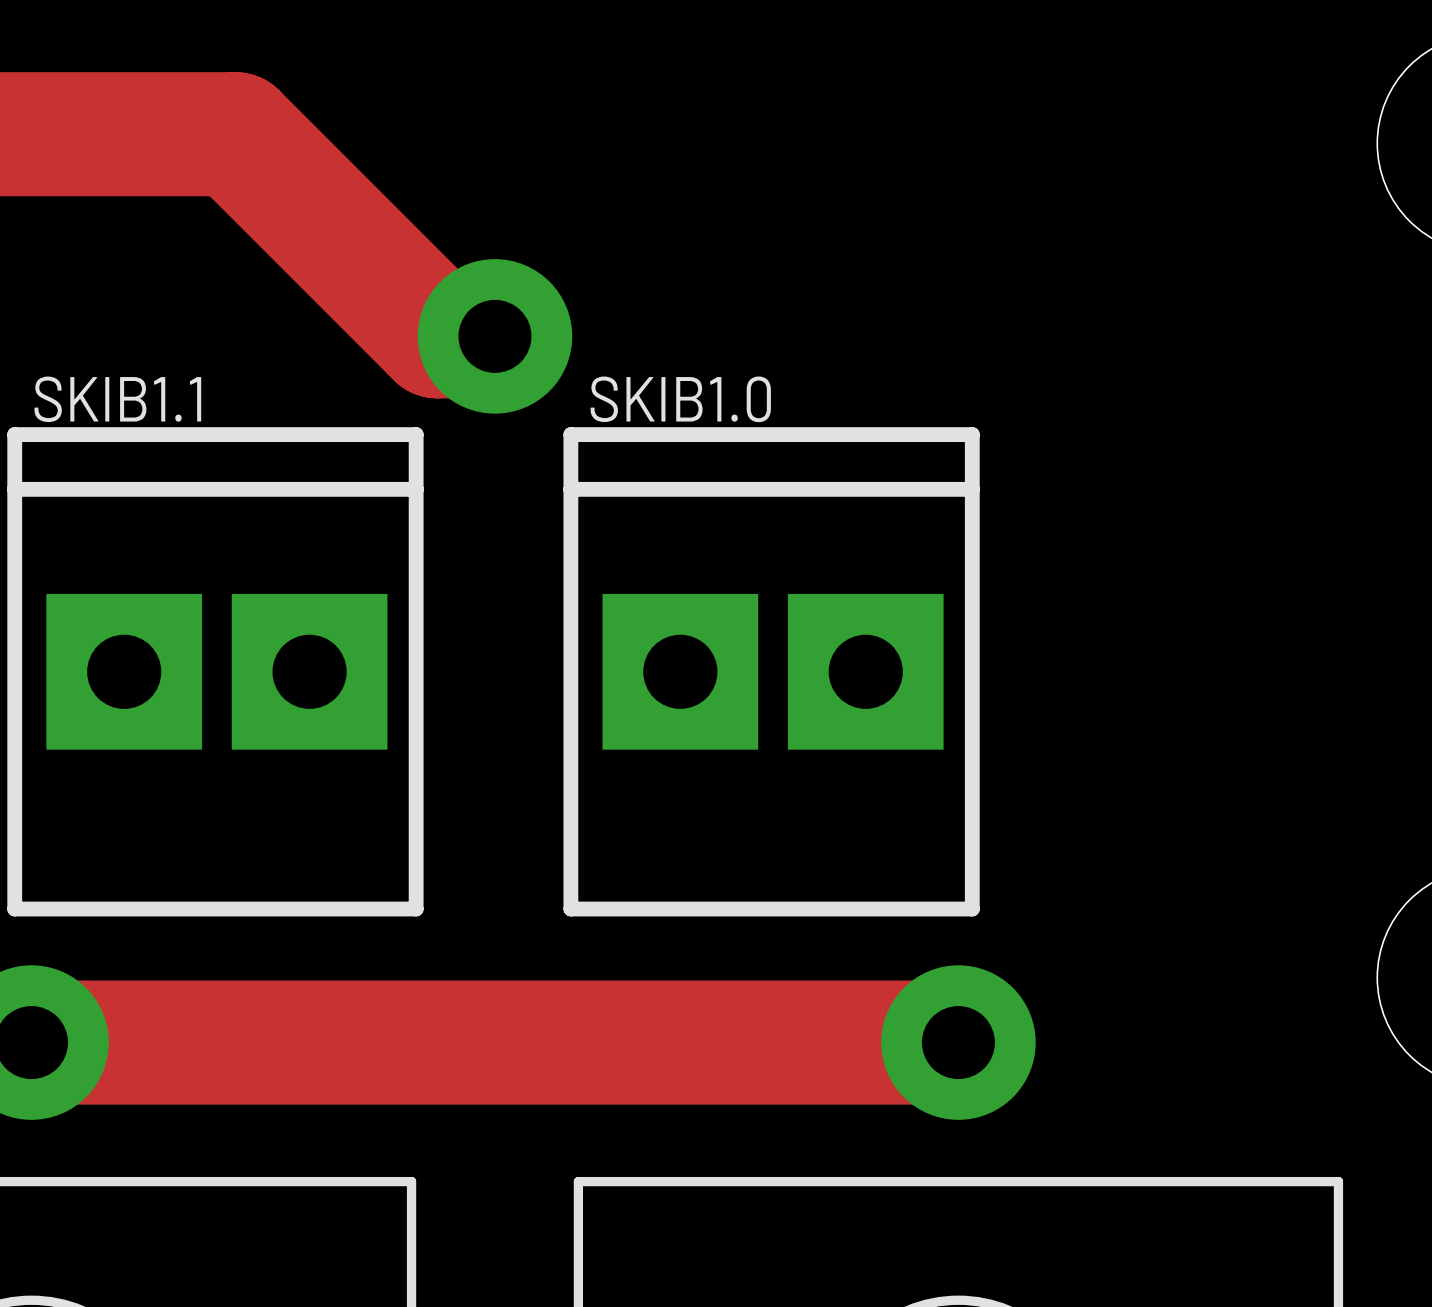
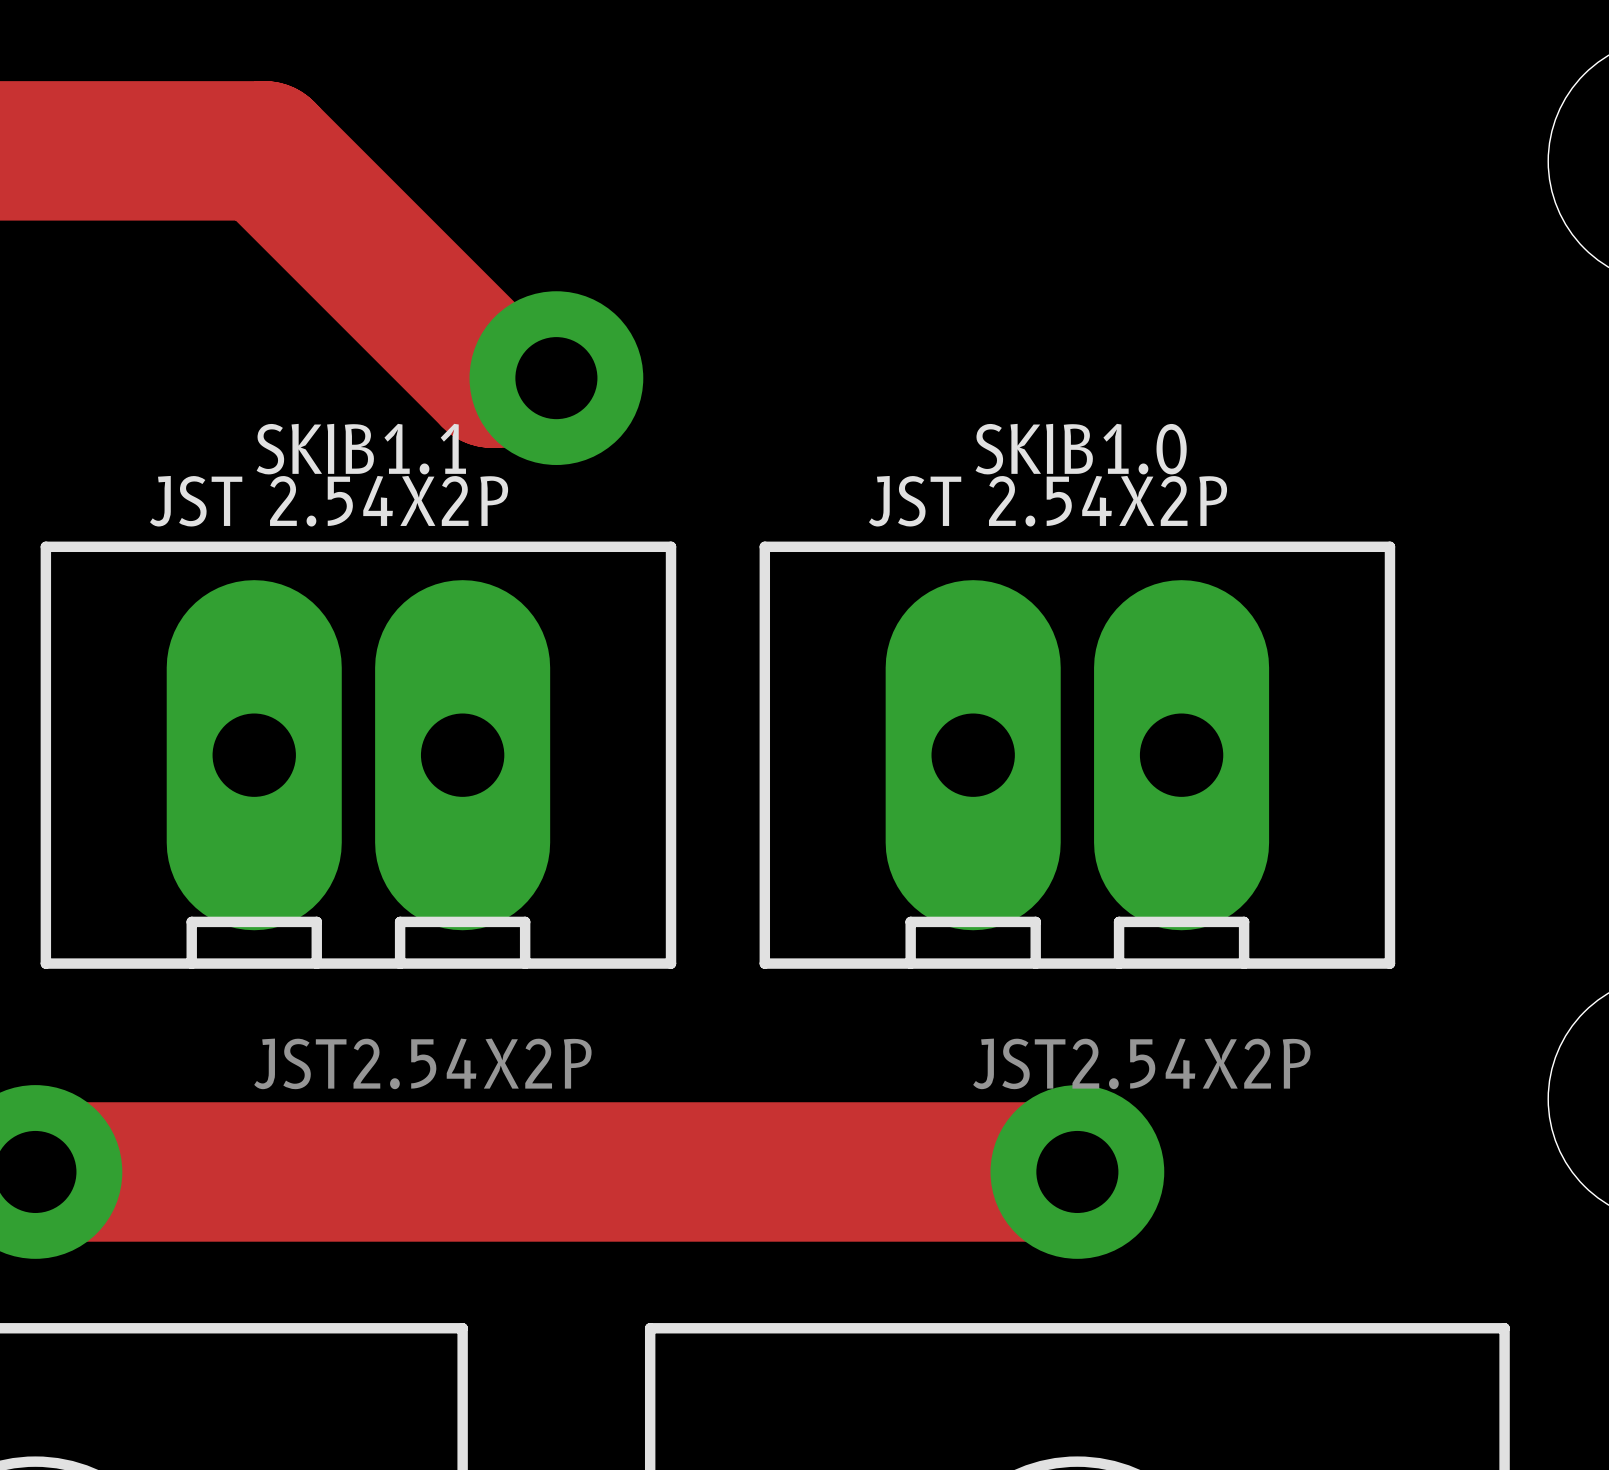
SKIB1.1 footprint: [7, 427, 424, 917] -> [40, 541, 677, 969]
SKIB1.0 footprint: [563, 427, 980, 917] -> [759, 541, 1396, 969]
SKIB1.1 value: none -> JST2.54X2P (422, 1063)
SKIB1.0 value: none -> JST2.54X2P (1141, 1063)

